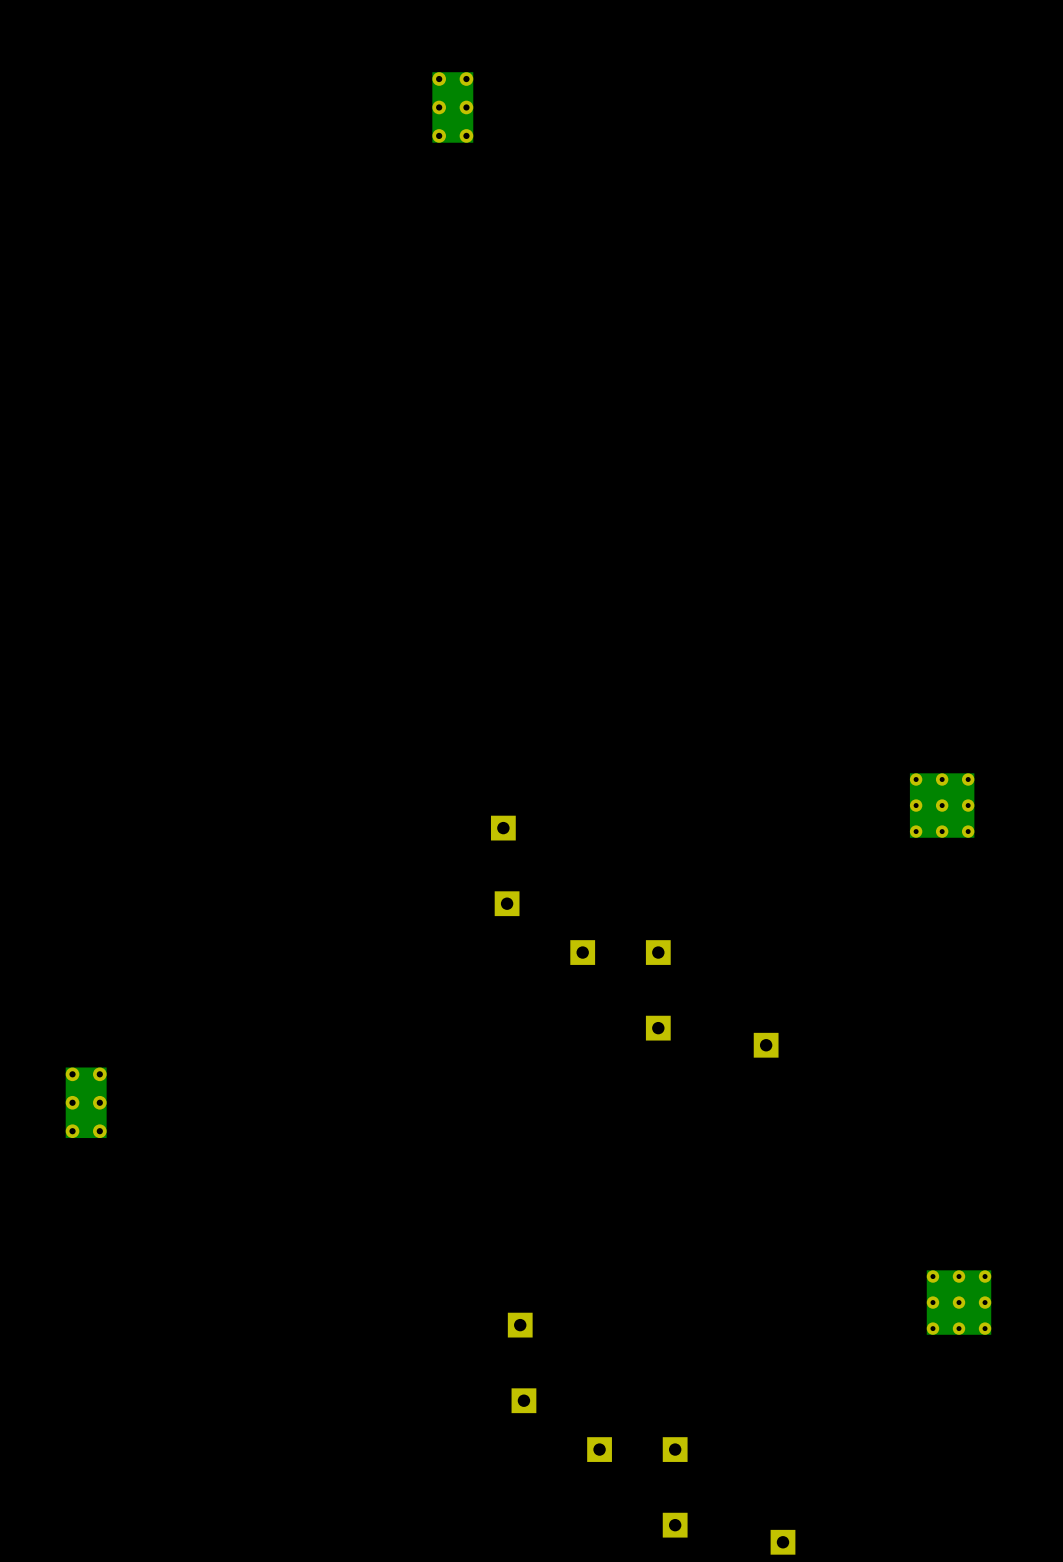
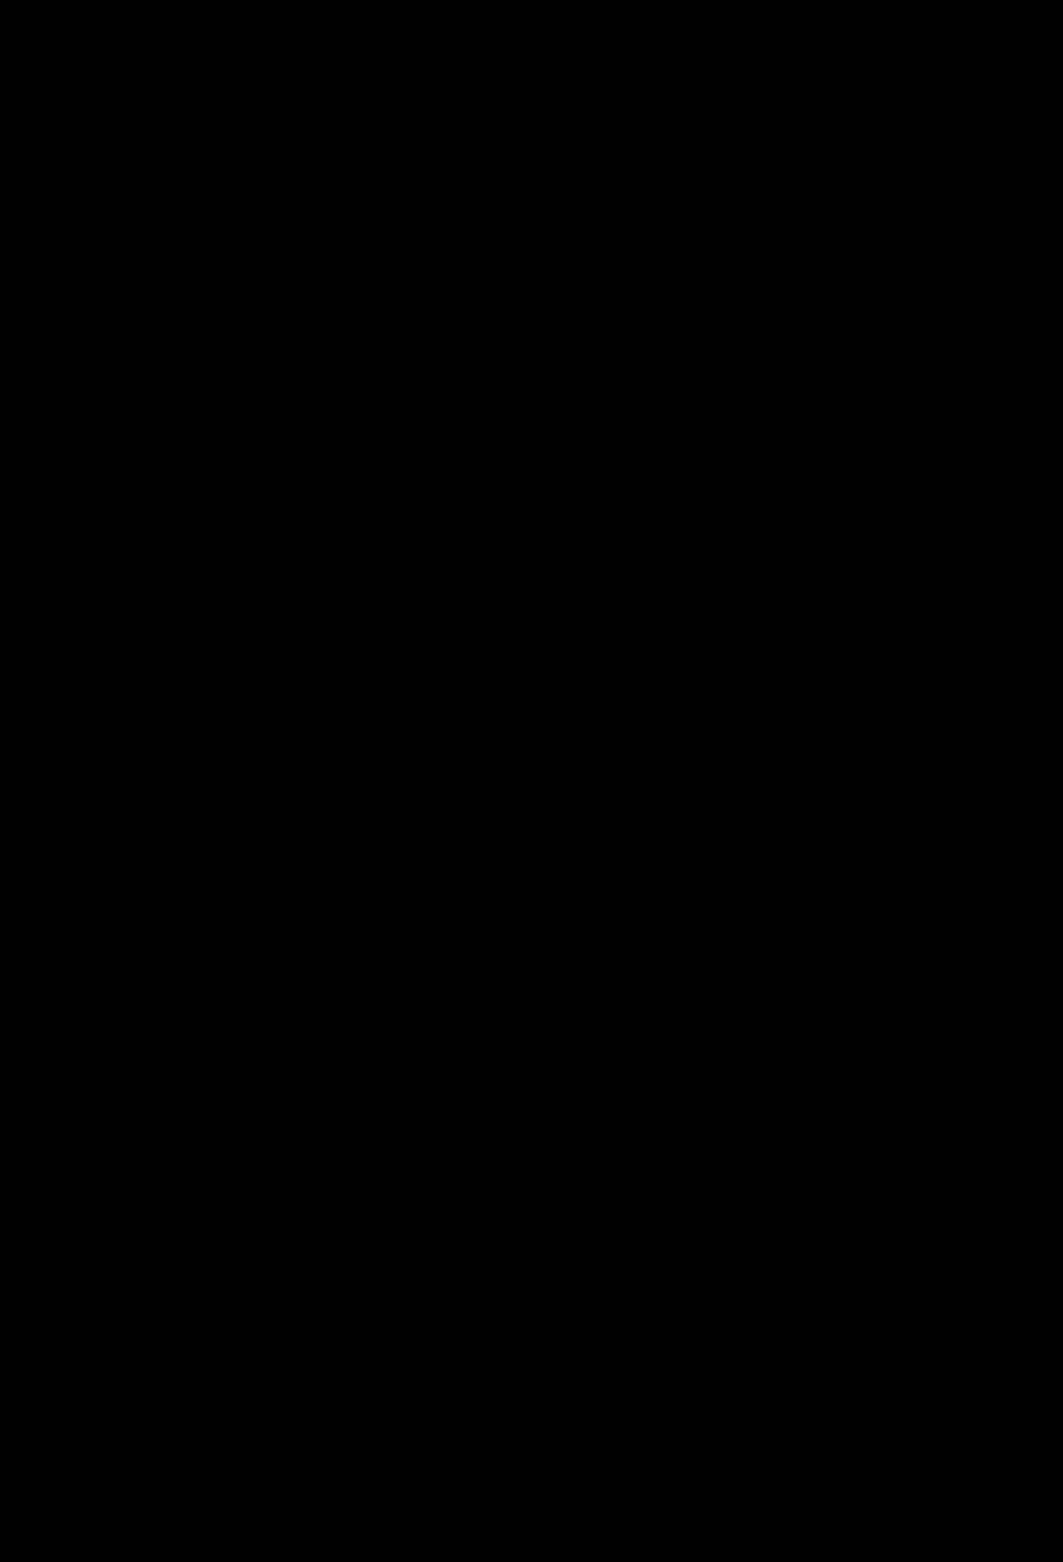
part: (452, 107) -> none
part: (942, 805) -> none
part: (503, 828) -> none
part: (507, 903) -> none
part: (582, 952) -> none
part: (658, 952) -> none
part: (658, 1028) -> none
part: (766, 1045) -> none
part: (86, 1102) -> none
part: (959, 1302) -> none
part: (520, 1325) -> none
part: (523, 1400) -> none
part: (599, 1449) -> none
part: (675, 1449) -> none
part: (675, 1525) -> none
part: (783, 1542) -> none

